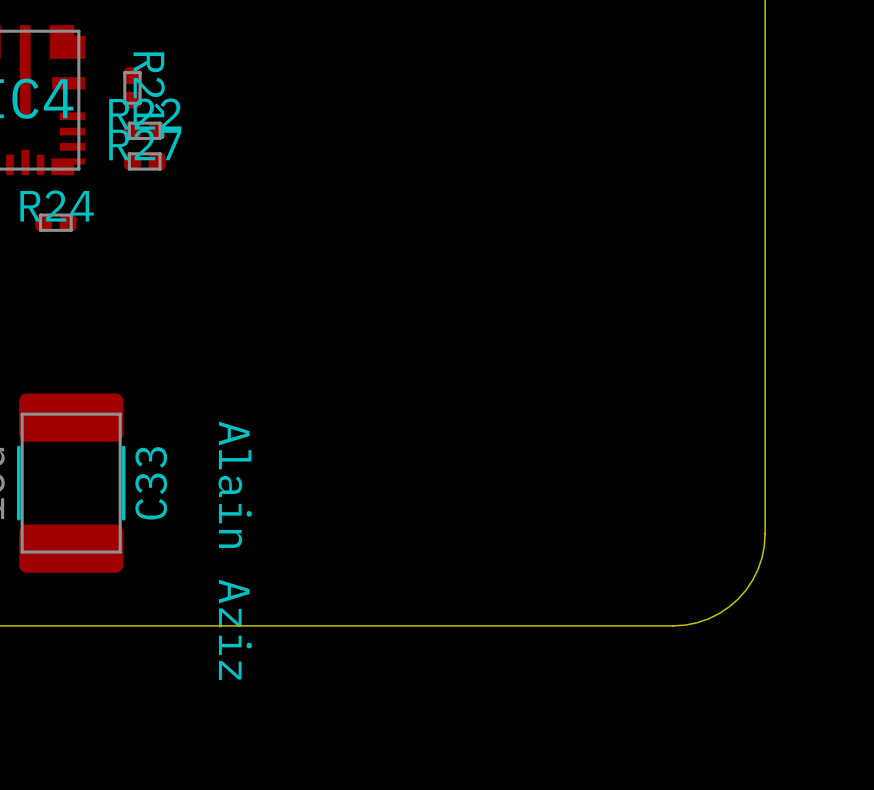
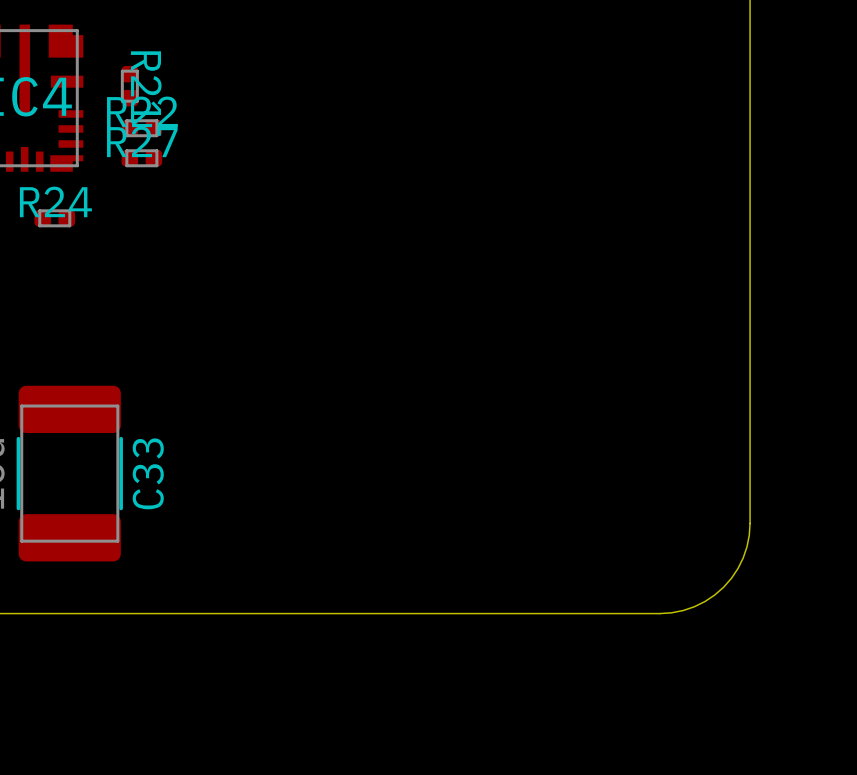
text: Alain Aziz (235, 550) -> none

